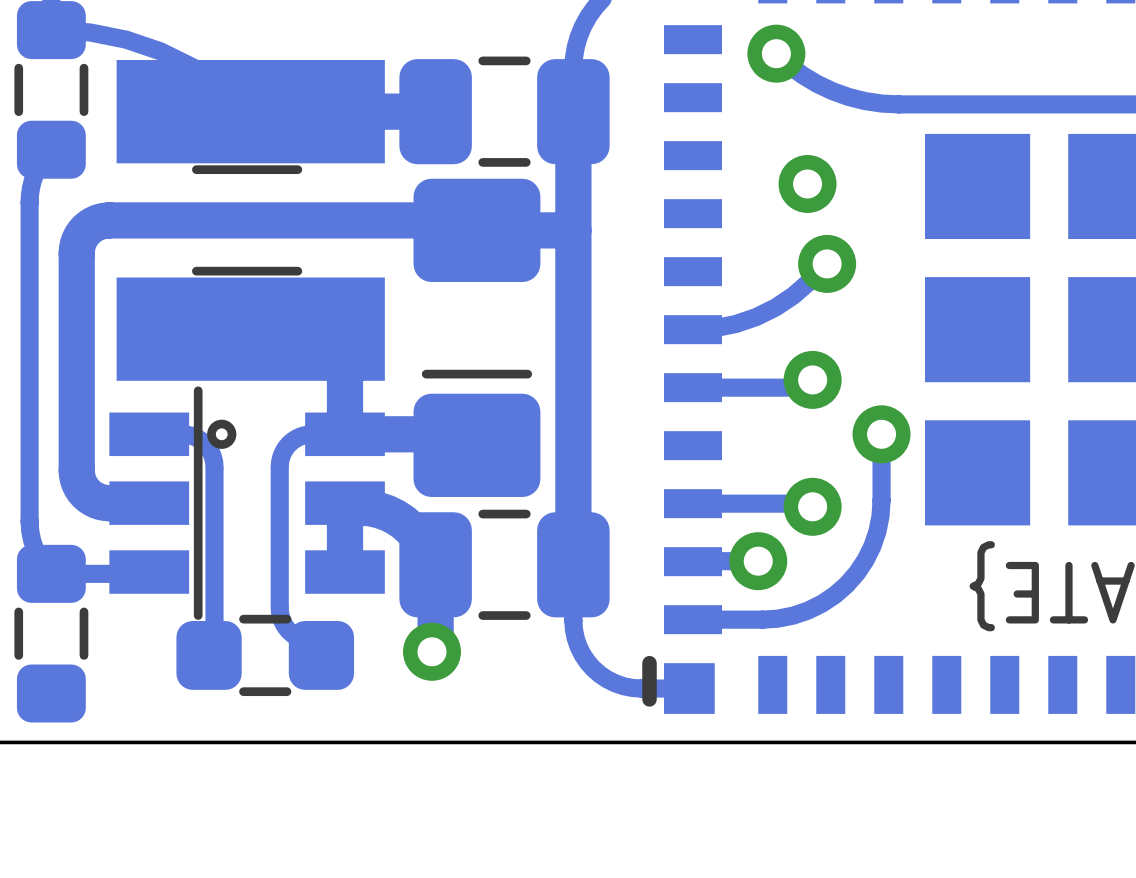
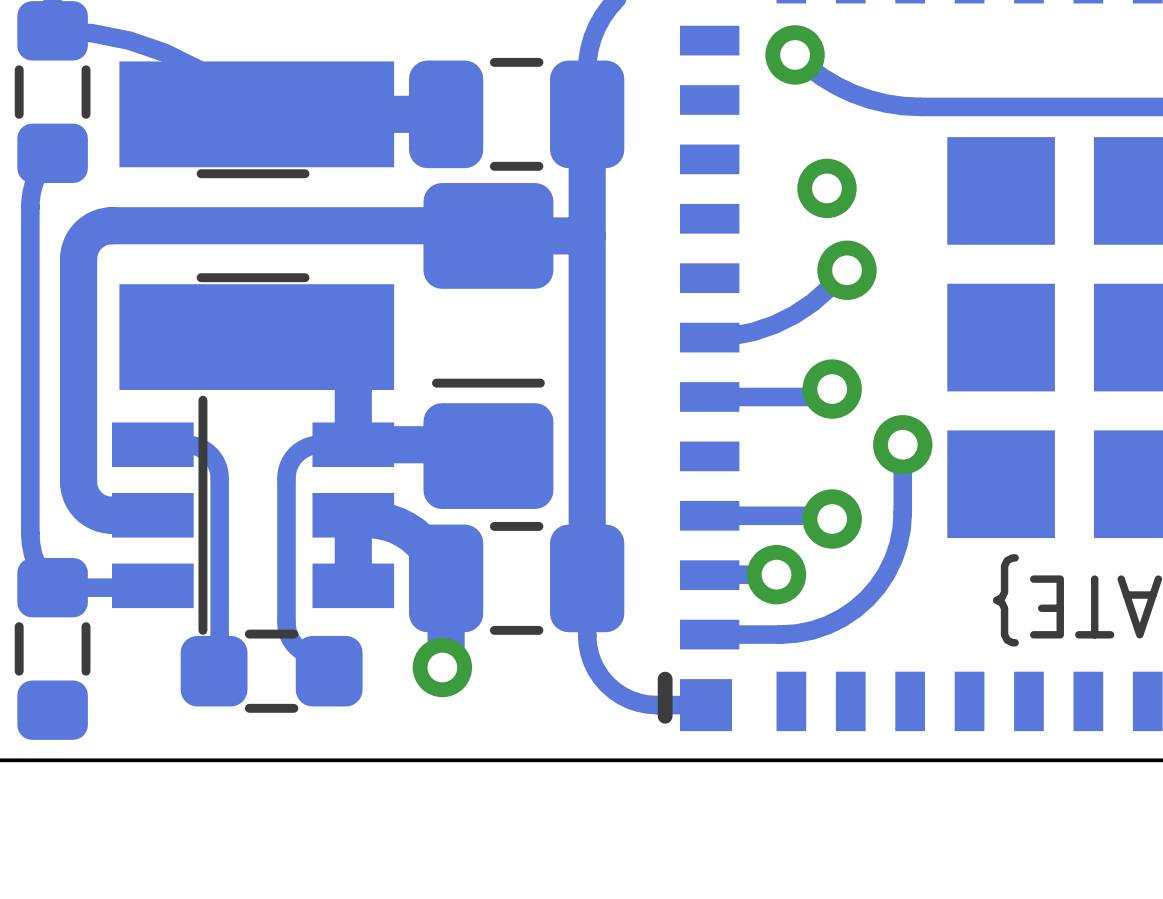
part footprint: [58, 59, 610, 690] -> [60, 60, 625, 707]

